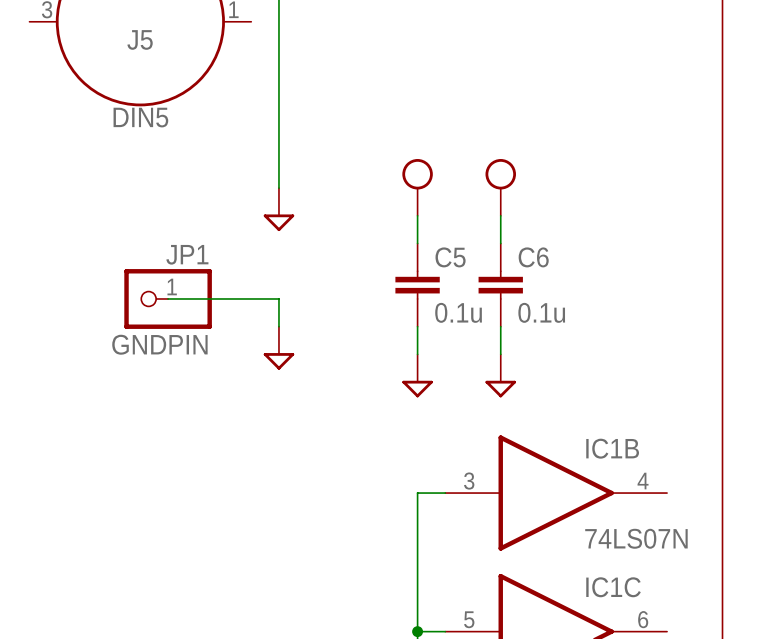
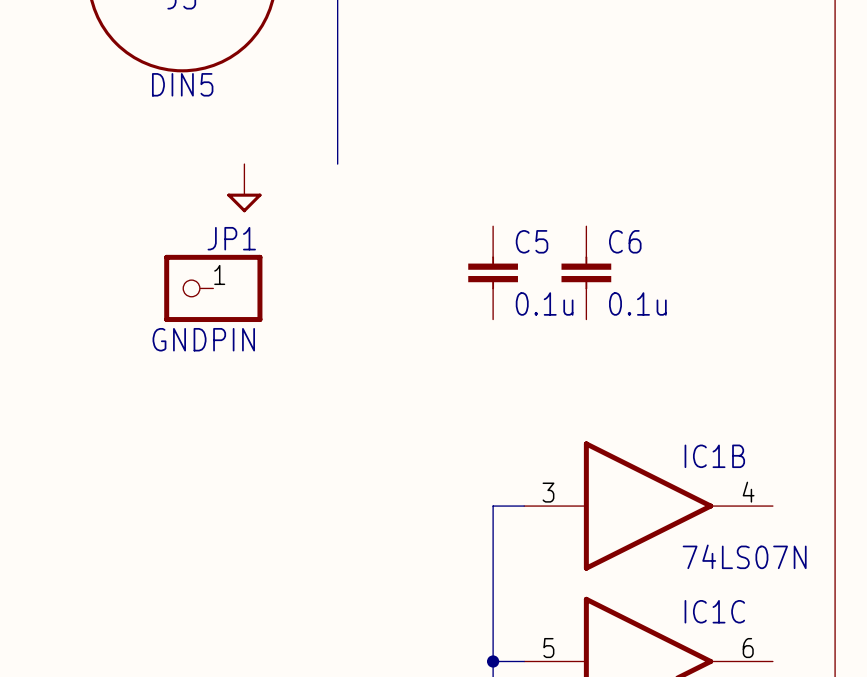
power symbol: (417, 187) -> none
power symbol: (500, 187) -> none
power symbol: none -> (244, 188)
power symbol: (278, 209) -> none
wire: (417, 215) (417, 243) -> none
wire: (500, 215) (500, 243) -> none
wire: (168, 298) (278, 298) (278, 326) -> none
wire: (417, 326) (417, 354) -> none
wire: (500, 326) (500, 354) -> none
power symbol: (278, 348) -> none
power symbol: (417, 375) -> none
power symbol: (500, 375) -> none

